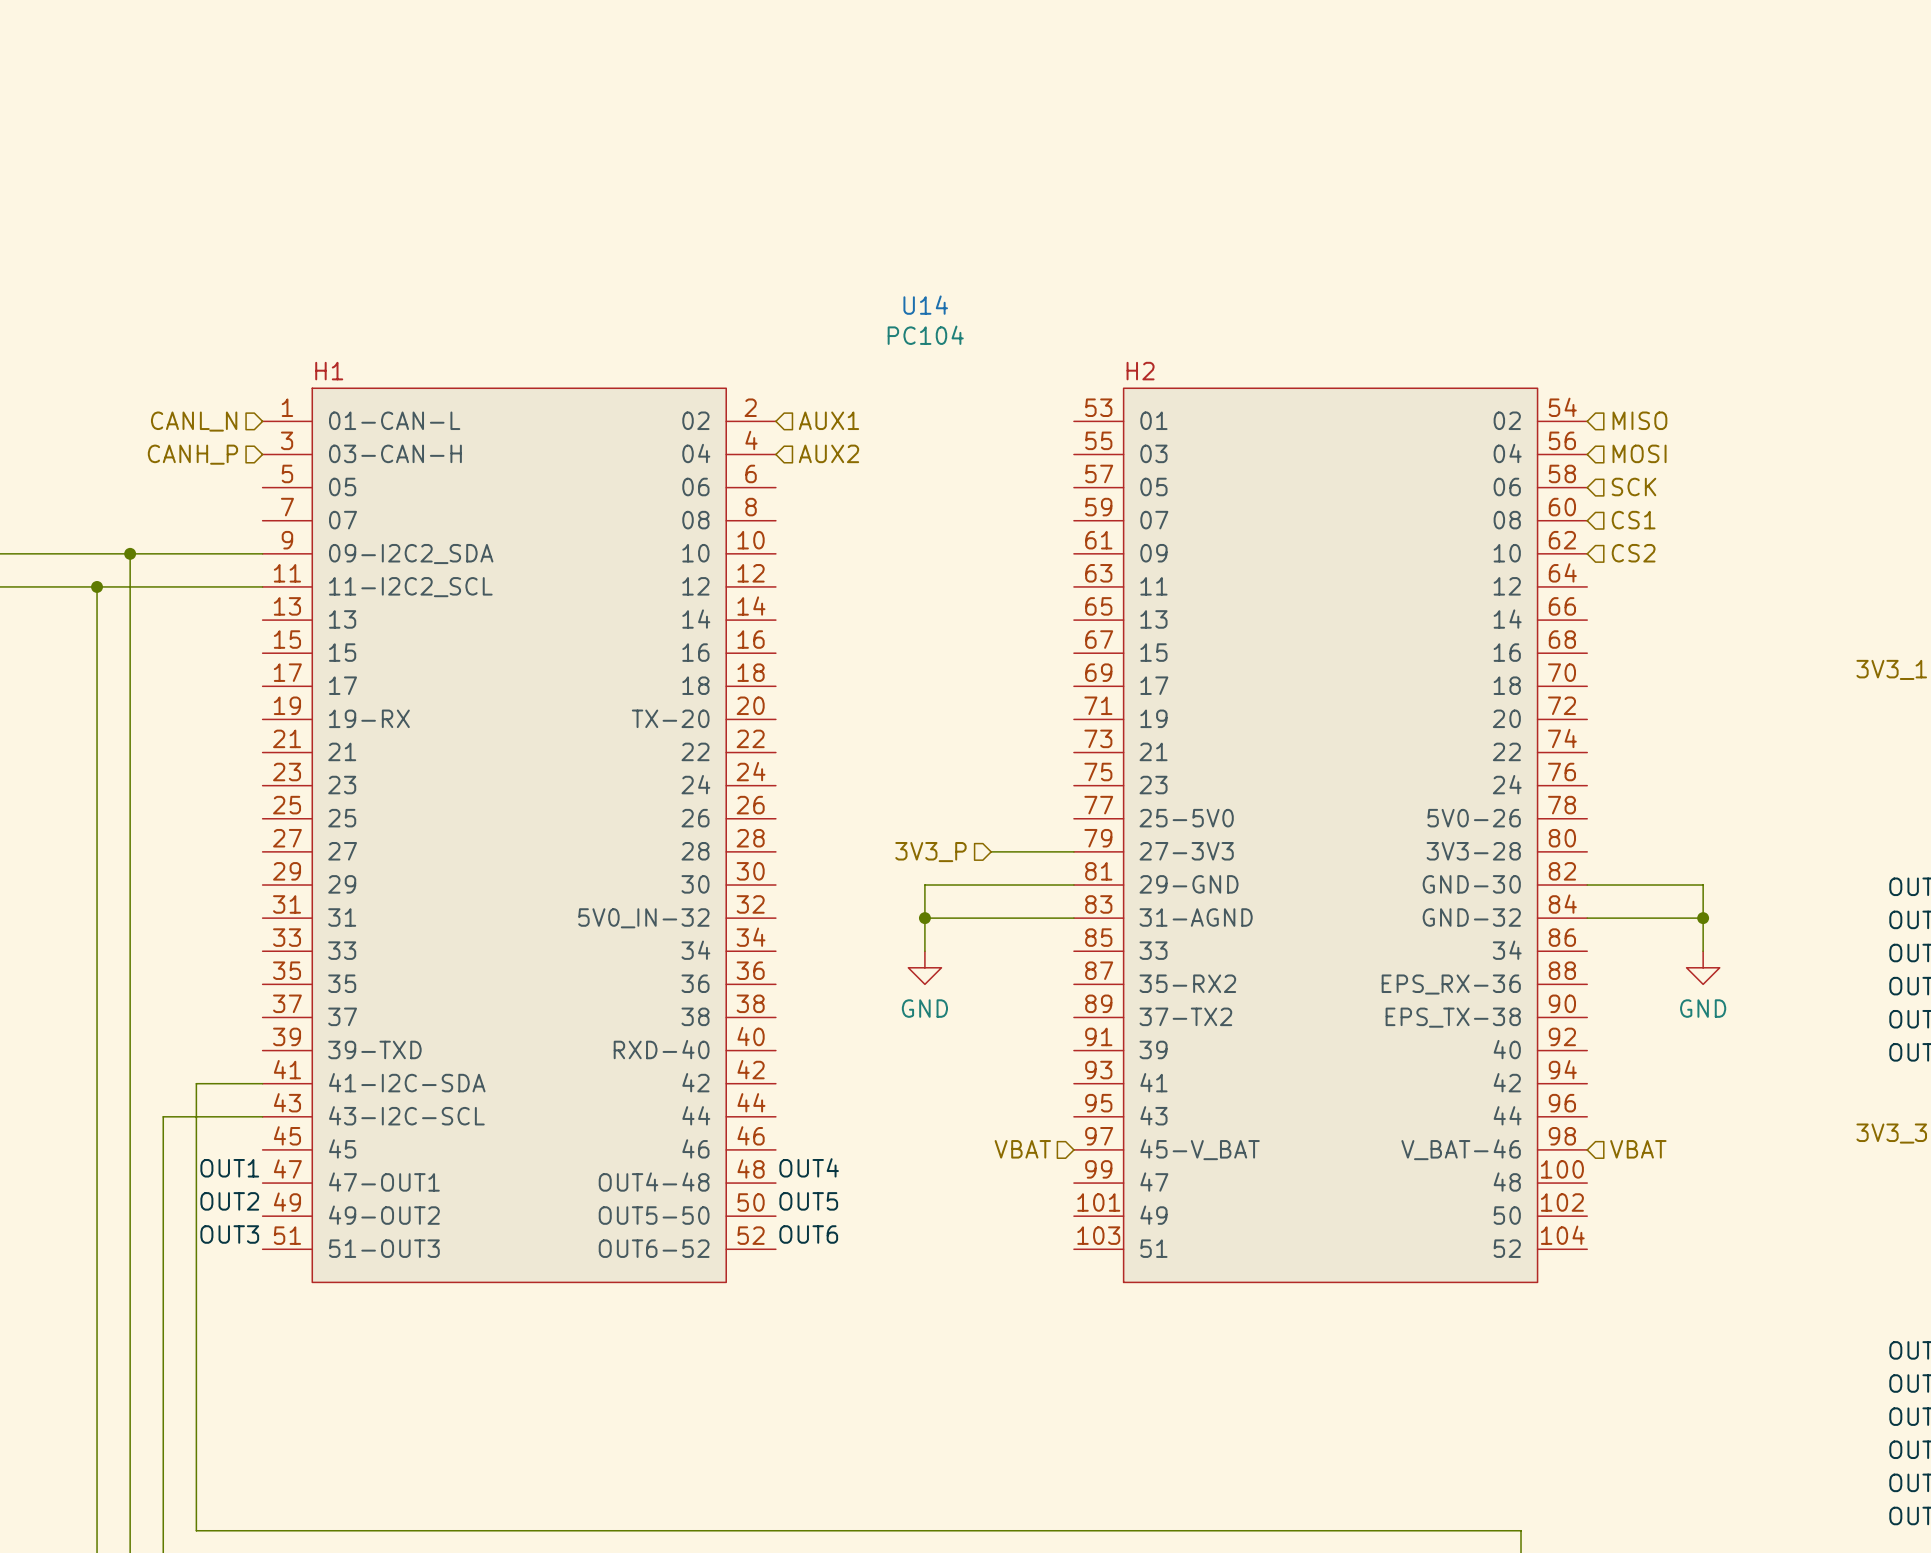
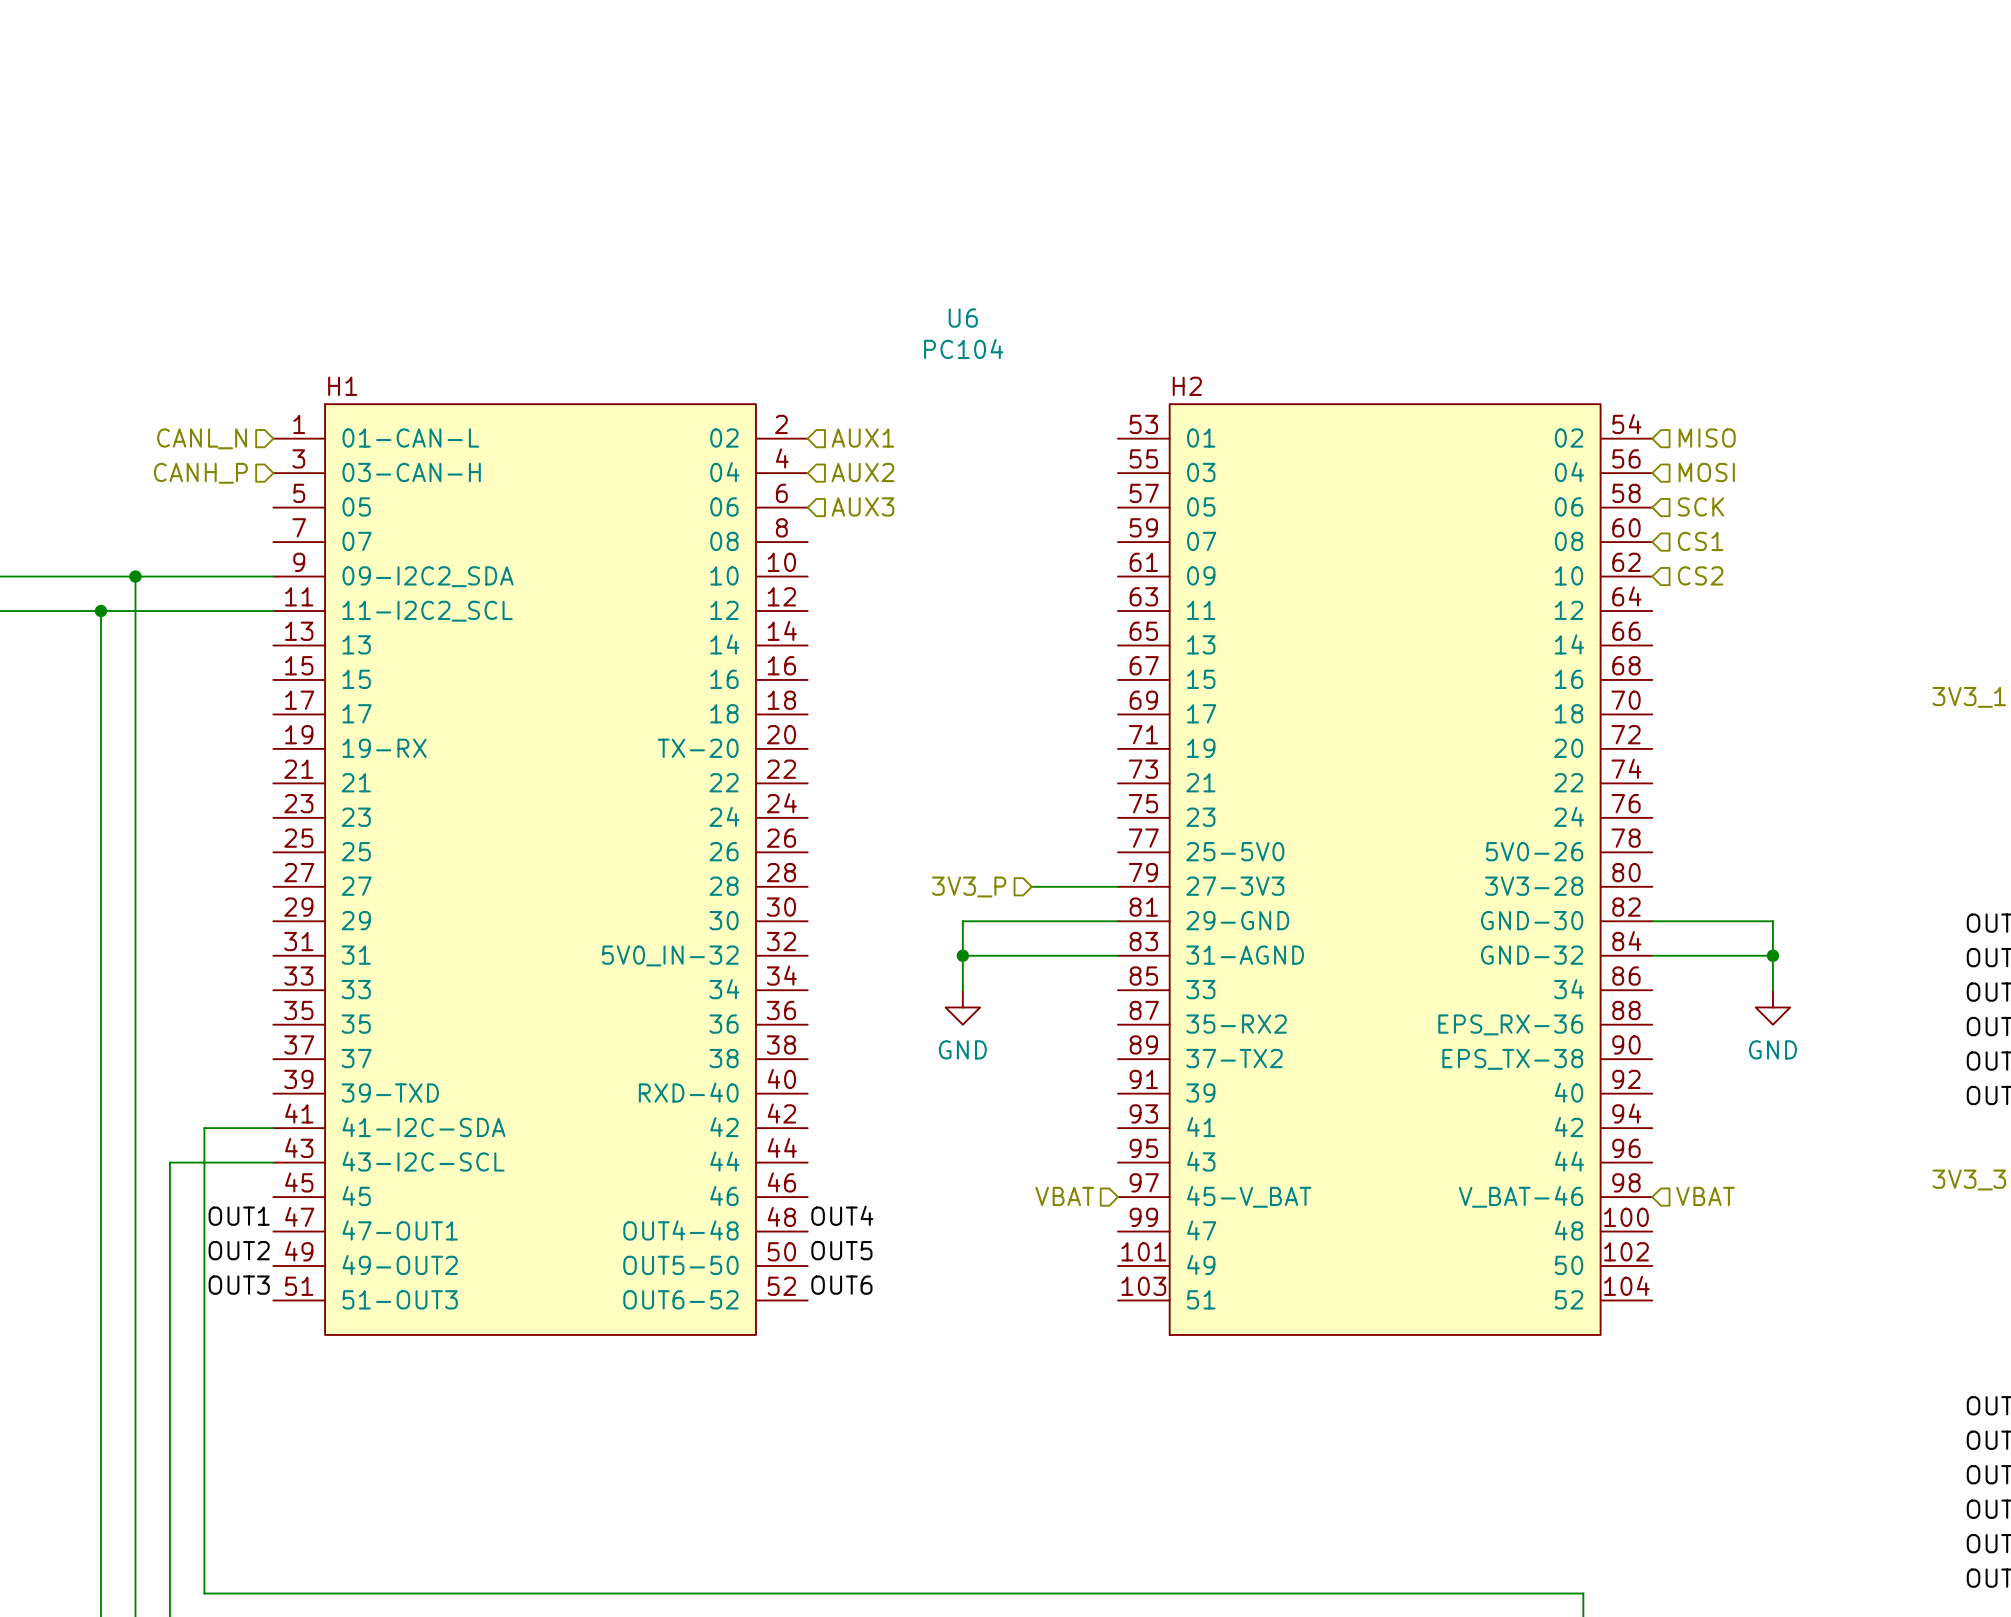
U14 name: U14 (925, 305) -> U6 (963, 318)
hierarchical label: none -> AUX3 (862, 506)

